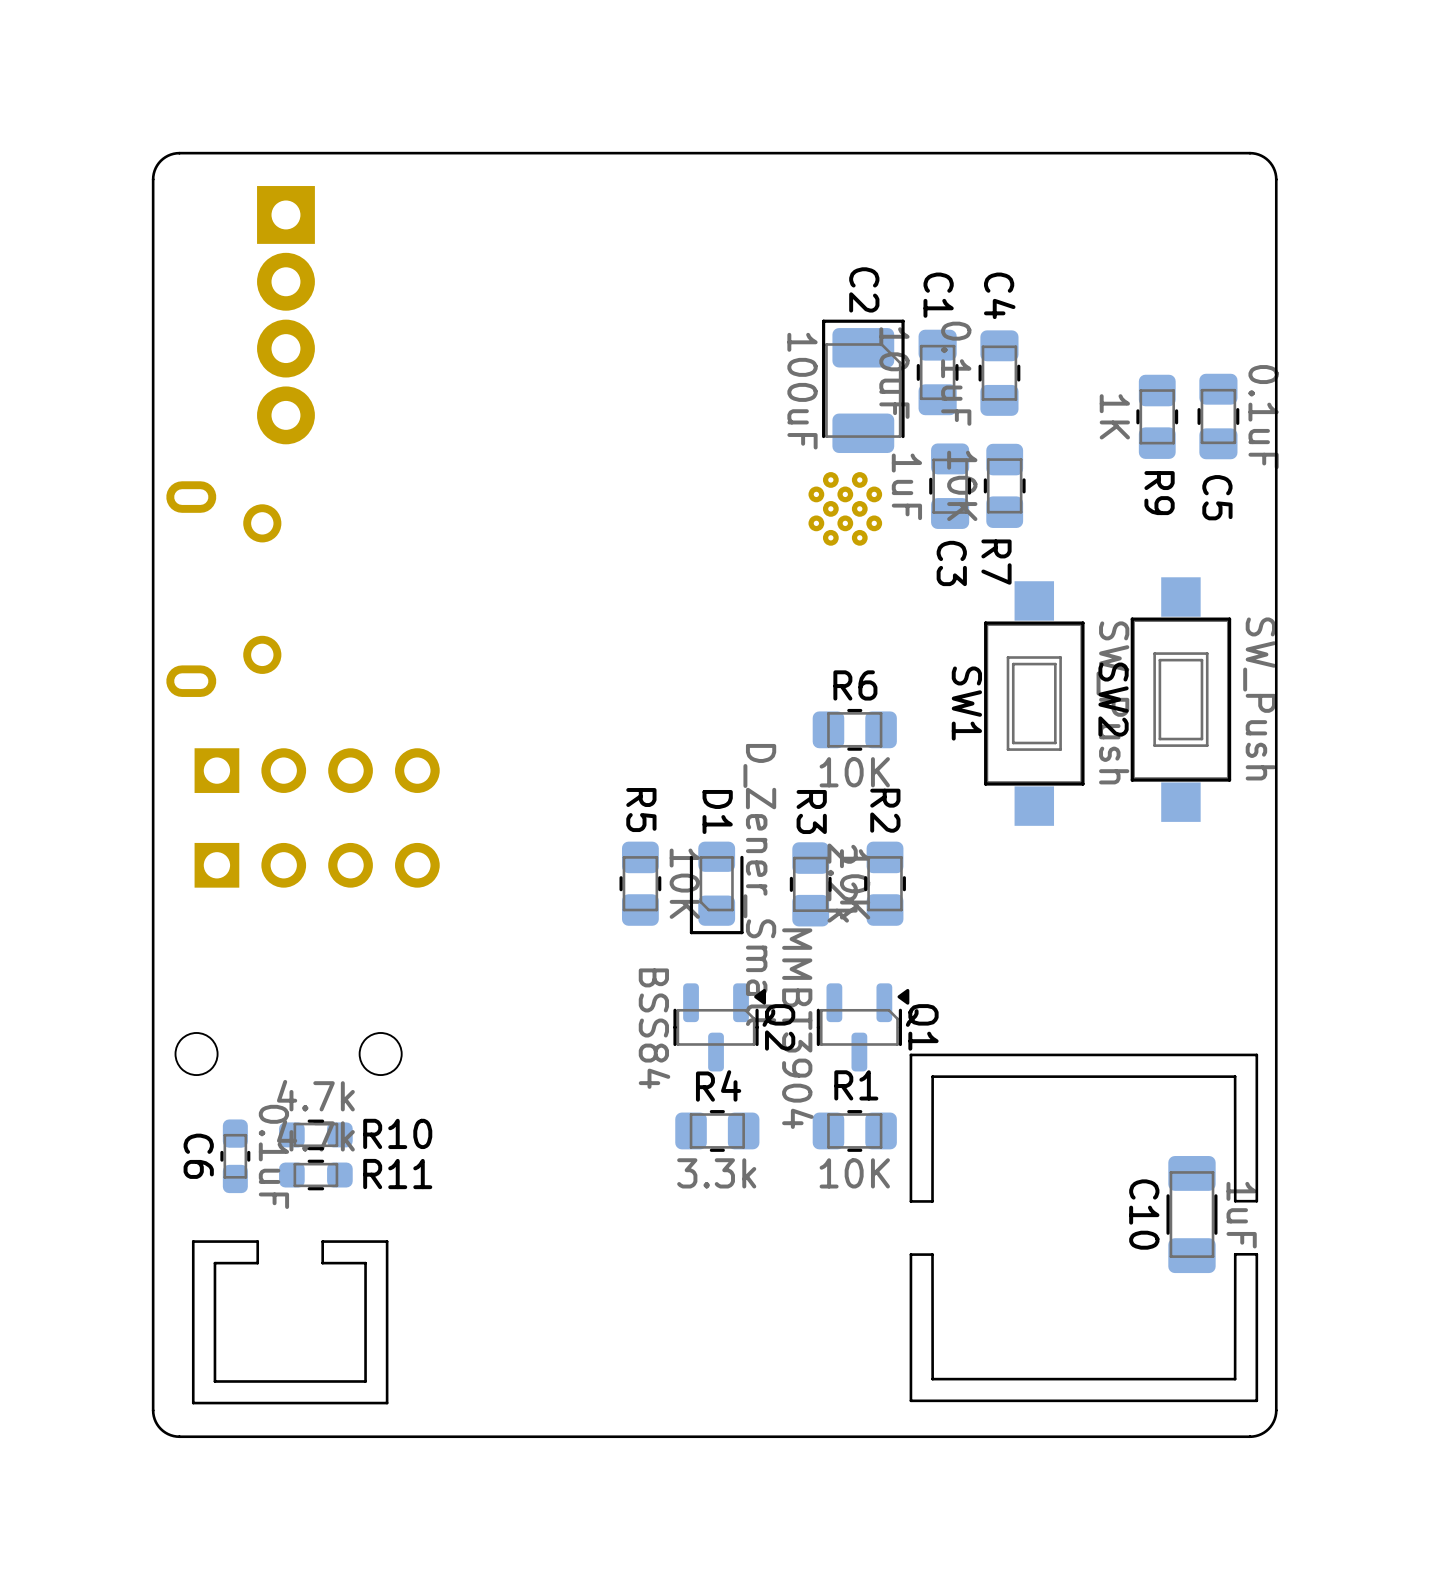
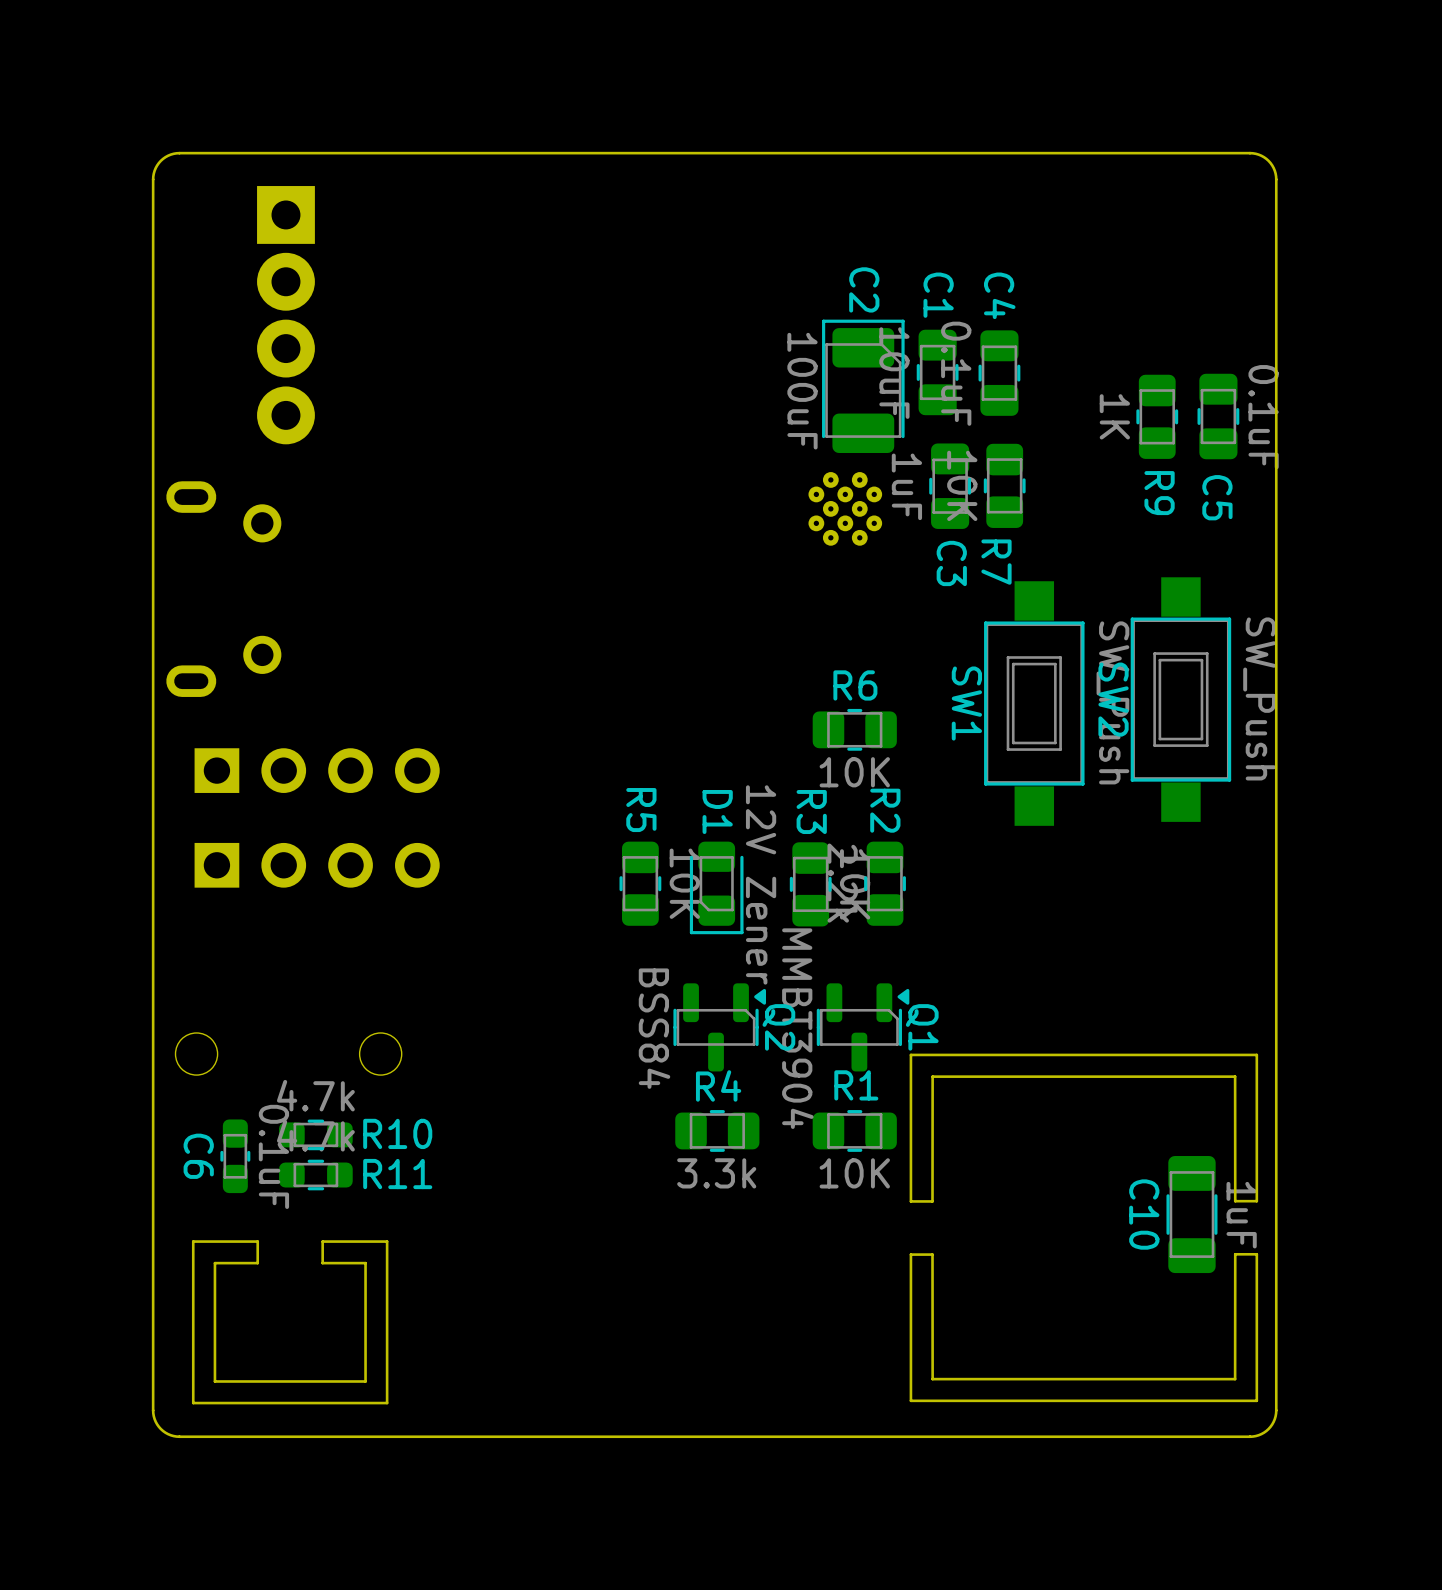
D1 value: D_Zener_Small (759, 884) -> 12V Zener (761, 884)

